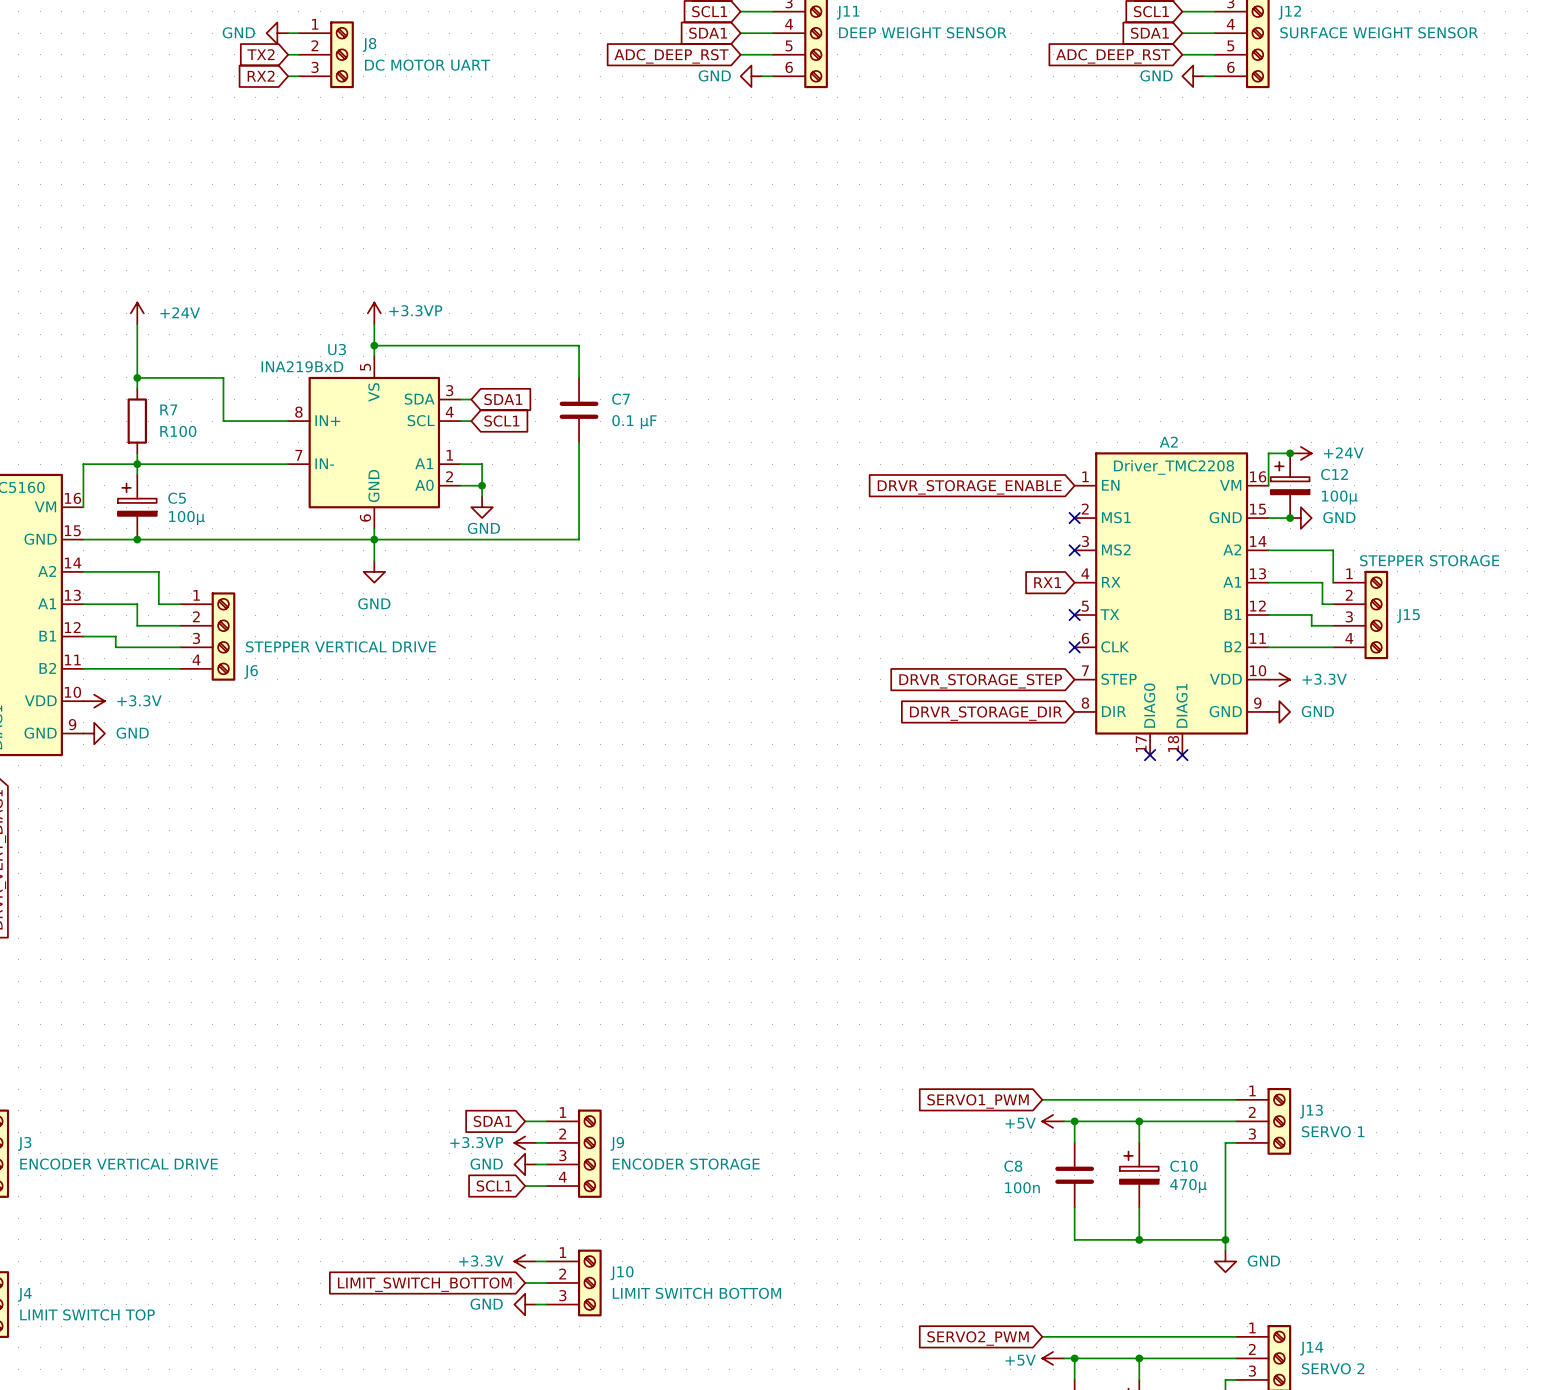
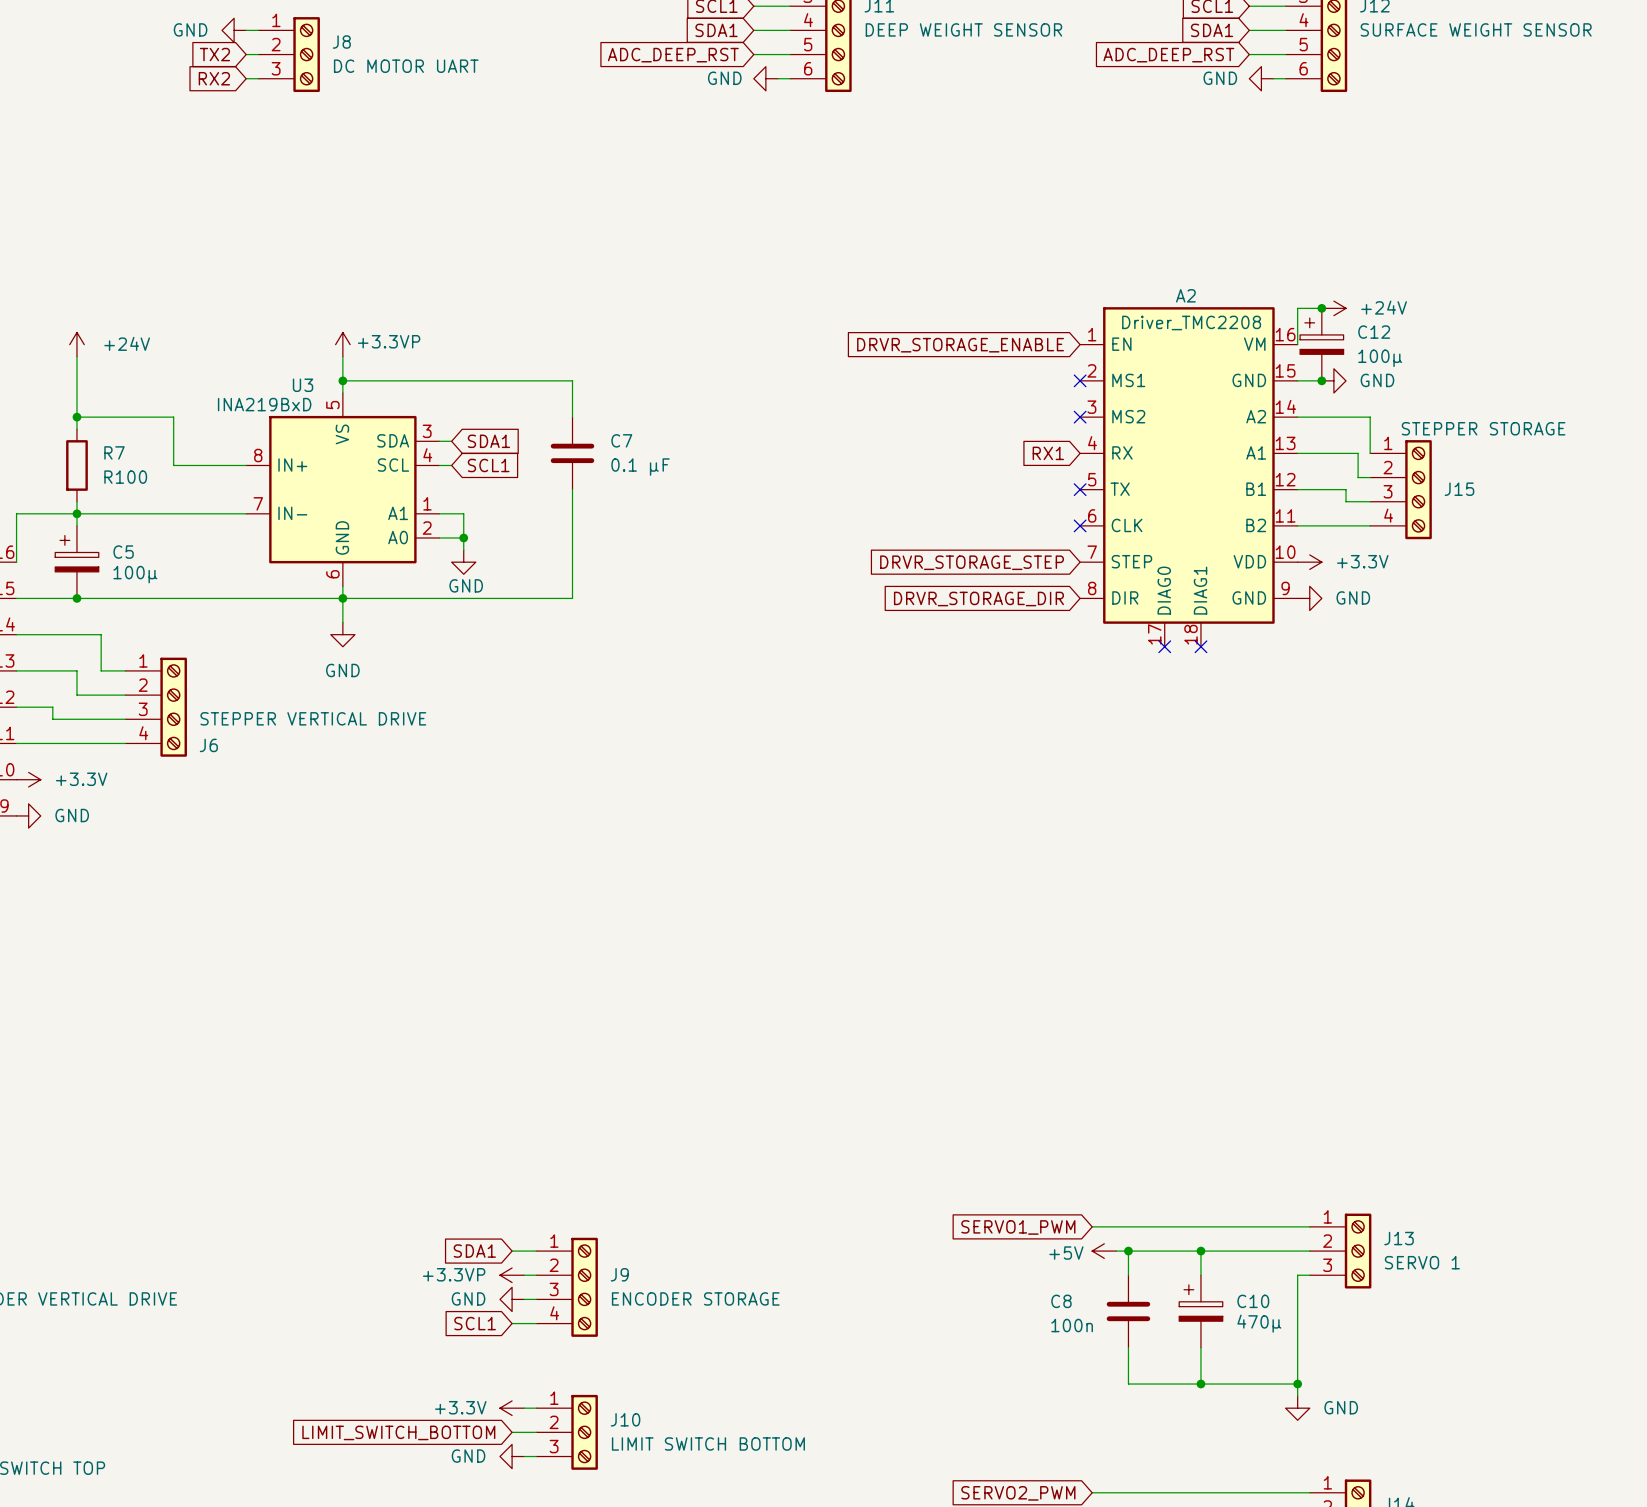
wire: none -> (1321, 308) (1297, 308) (1297, 344)
junction: none -> (1321, 308)
no-connect mark: none -> (1080, 380)
junction: none -> (1321, 380)
power symbol: none -> GND (1333, 380)
no-connect mark: none -> (1080, 417)
no-connect mark: none -> (1080, 489)
wire: (1268, 453) (1268, 485) -> (1346, 501) (1346, 489) (1297, 489)
junction: (1290, 453) -> none
power symbol position: +24V (1300, 453) -> +24V (1333, 308)
no-connect mark: none -> (1080, 525)
C12 position: (1290, 485) -> (1321, 344)
global label position: DRVR_STORAGE_ENABLE (969, 487) -> DRVR_STORAGE_ENABLE (960, 345)
no-connect mark: (1074, 518) -> none
wire: (1268, 518) (1290, 518) -> (1297, 380) (1321, 380)
junction: (1290, 518) -> none
power symbol position: GND (1300, 518) -> GND (1309, 598)
no-connect mark: (1074, 550) -> none
wire: (1268, 550) (1333, 550) (1333, 582) -> (1297, 417) (1370, 417) (1370, 453)
global label position: RX1 (1047, 582) -> RX1 (1048, 453)
no-connect mark: none -> (1164, 646)
no-connect mark: none -> (1200, 646)
wire: (1268, 582) (1322, 582) (1322, 604) (1333, 604) -> (1297, 453) (1358, 453) (1358, 477) (1370, 477)
A2 position: (1171, 603) -> (1188, 476)
no-connect mark: (1074, 615) -> none
wire: (1268, 615) (1311, 615) (1311, 625) (1333, 625) -> none
J15 position: (1360, 615) -> (1400, 489)
no-connect mark: (1074, 647) -> none
wire: (1268, 647) (1333, 647) -> (1297, 525) (1370, 525)
power symbol position: +3.3V (1279, 679) -> +3.3V (1309, 562)
global label position: DRVR_STORAGE_STEP (980, 681) -> DRVR_STORAGE_STEP (972, 562)
power symbol: GND (1279, 711) -> none
global label position: DRVR_STORAGE_DIR (986, 713) -> DRVR_STORAGE_DIR (978, 599)
no-connect mark: (1150, 755) -> none
no-connect mark: (1182, 755) -> none

